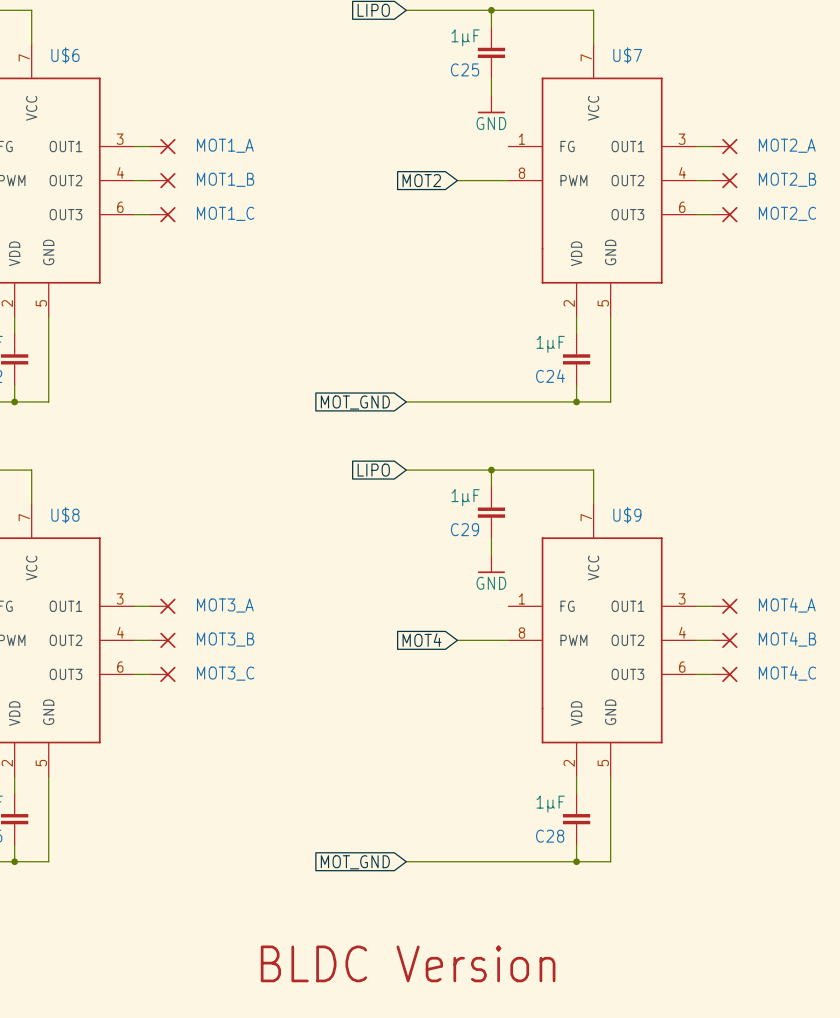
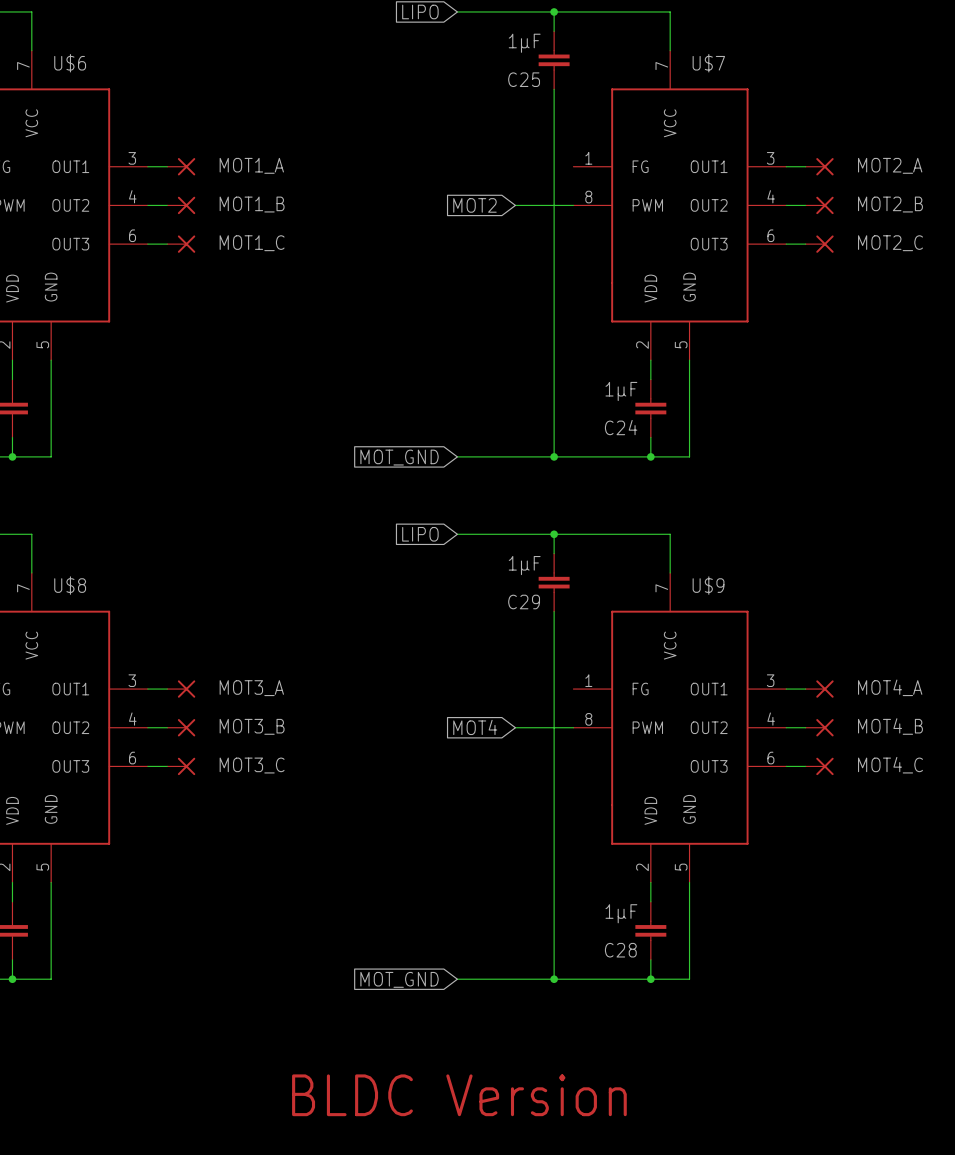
wire: none -> (554, 108) (554, 456)
power symbol: GND (491, 104) -> none
junction: none -> (554, 456)
wire: none -> (554, 631) (554, 979)
power symbol: GND (491, 564) -> none
junction: none -> (554, 979)

